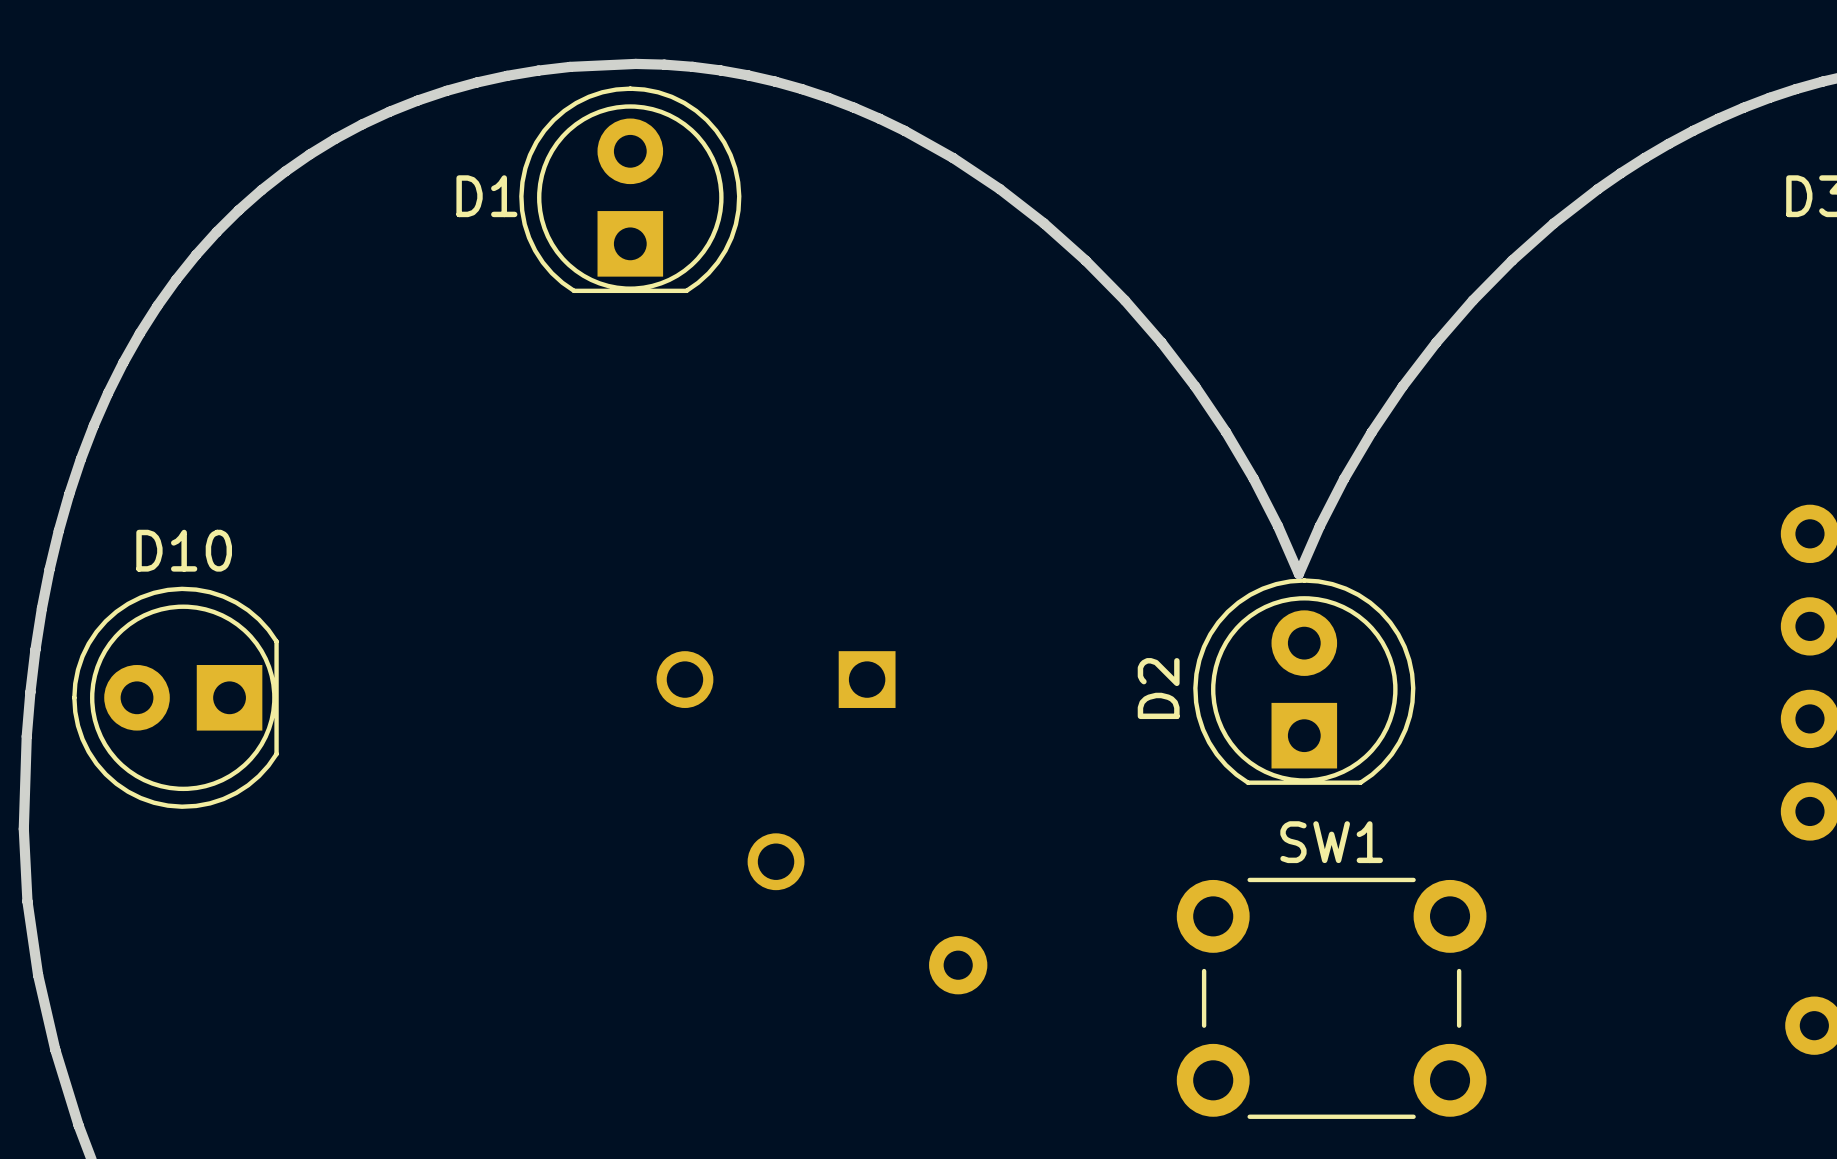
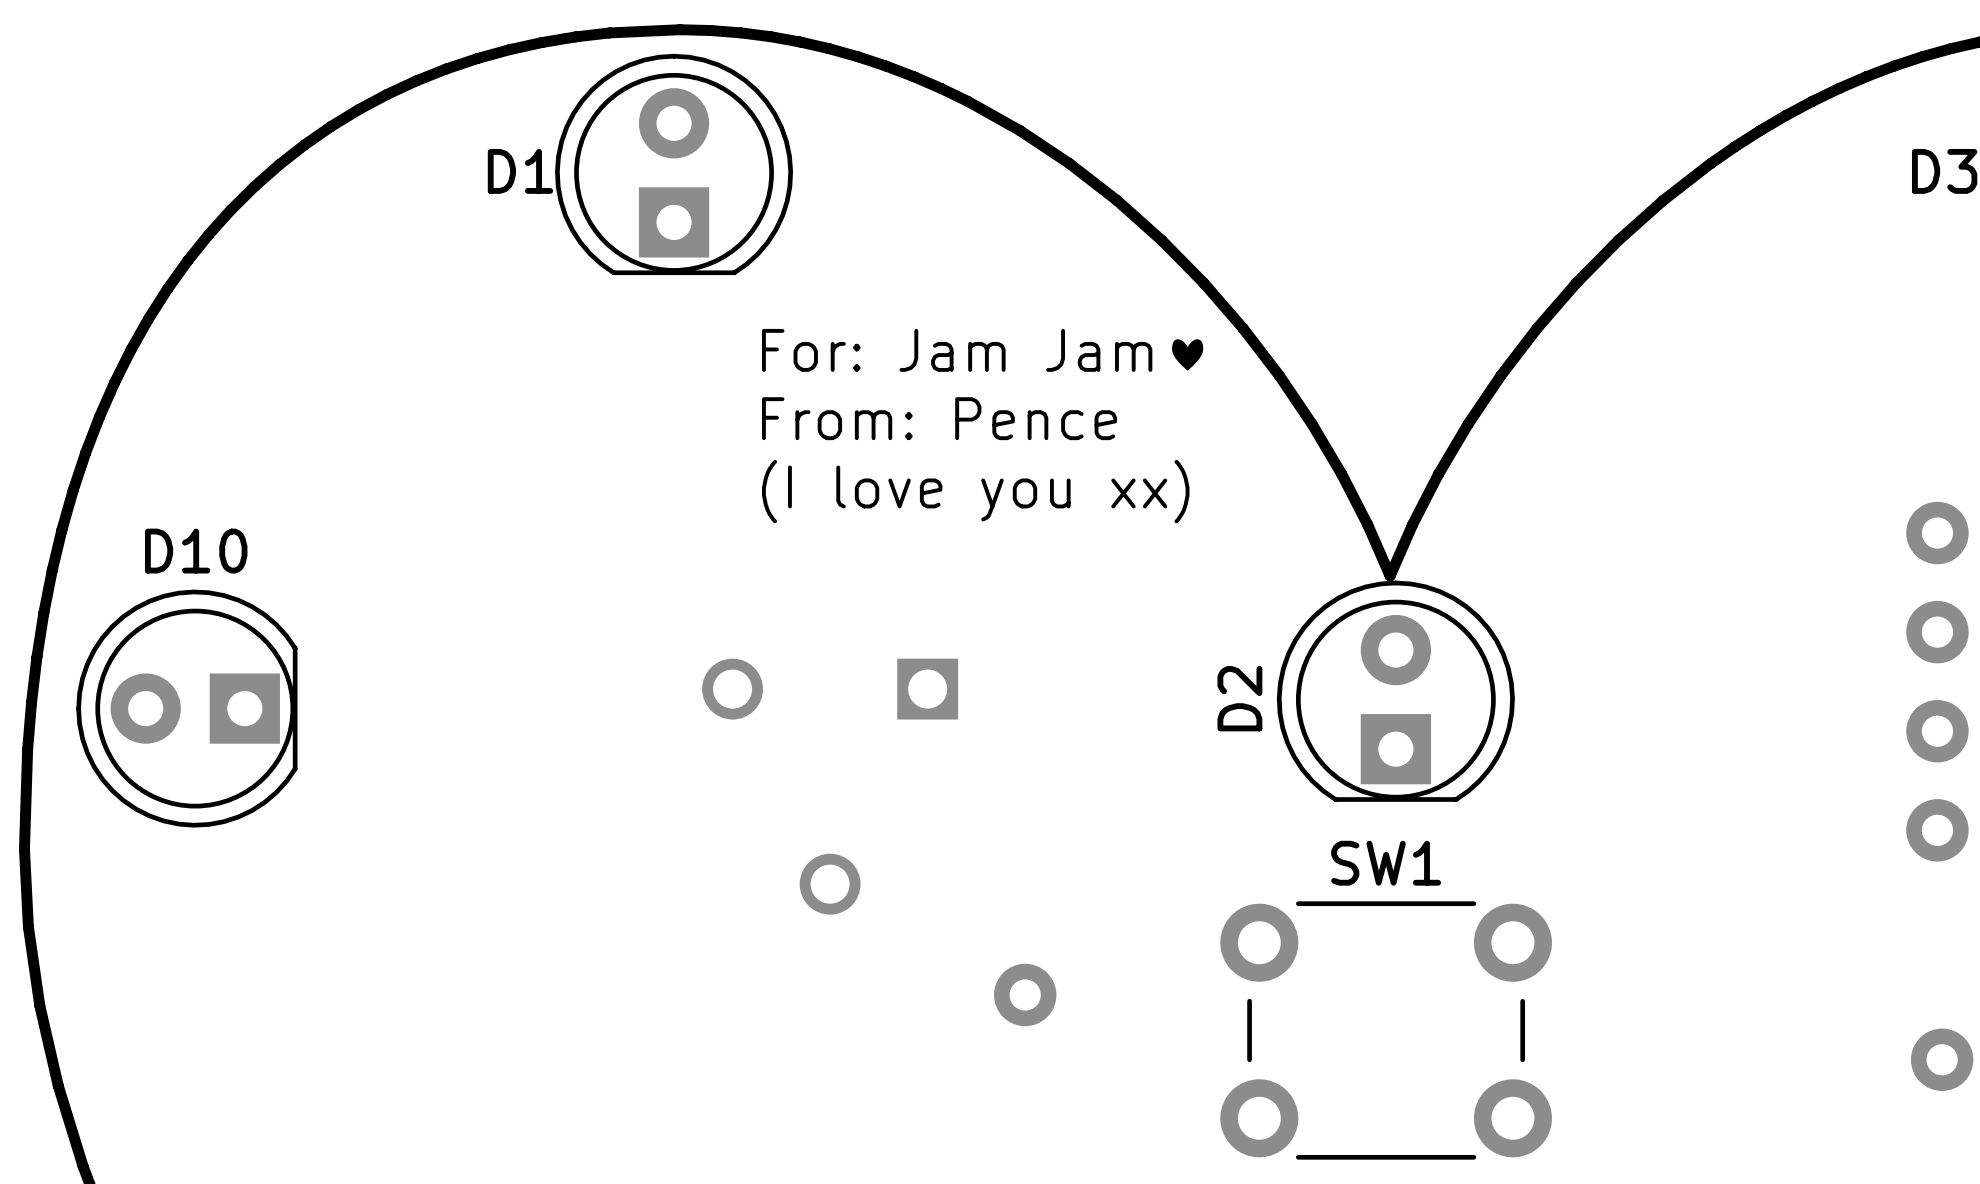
drawing: none -> [1172, 339, 1204, 371]
text: none -> For: Jam Jam (957, 350)
text: none -> From: Pence (939, 418)
text: none -> (I love you xx) (975, 491)
SW1 position: (1331, 998) -> (1386, 1030)

